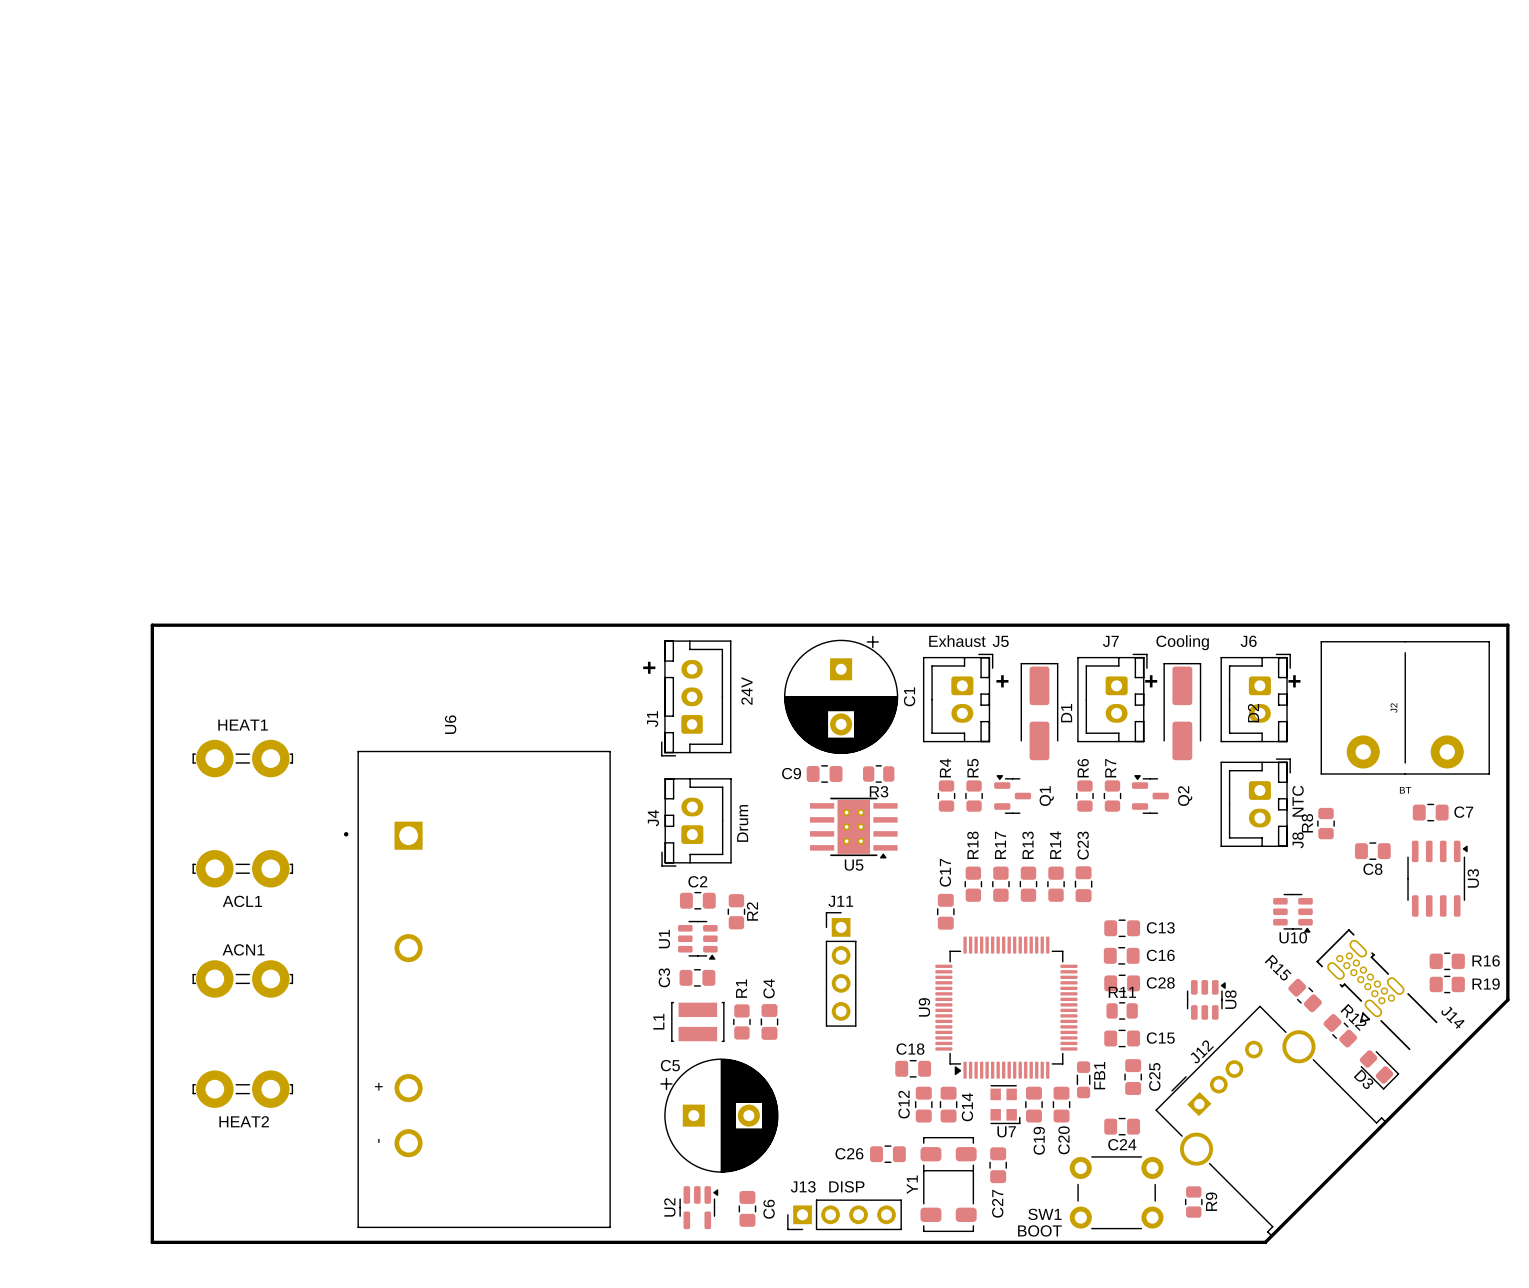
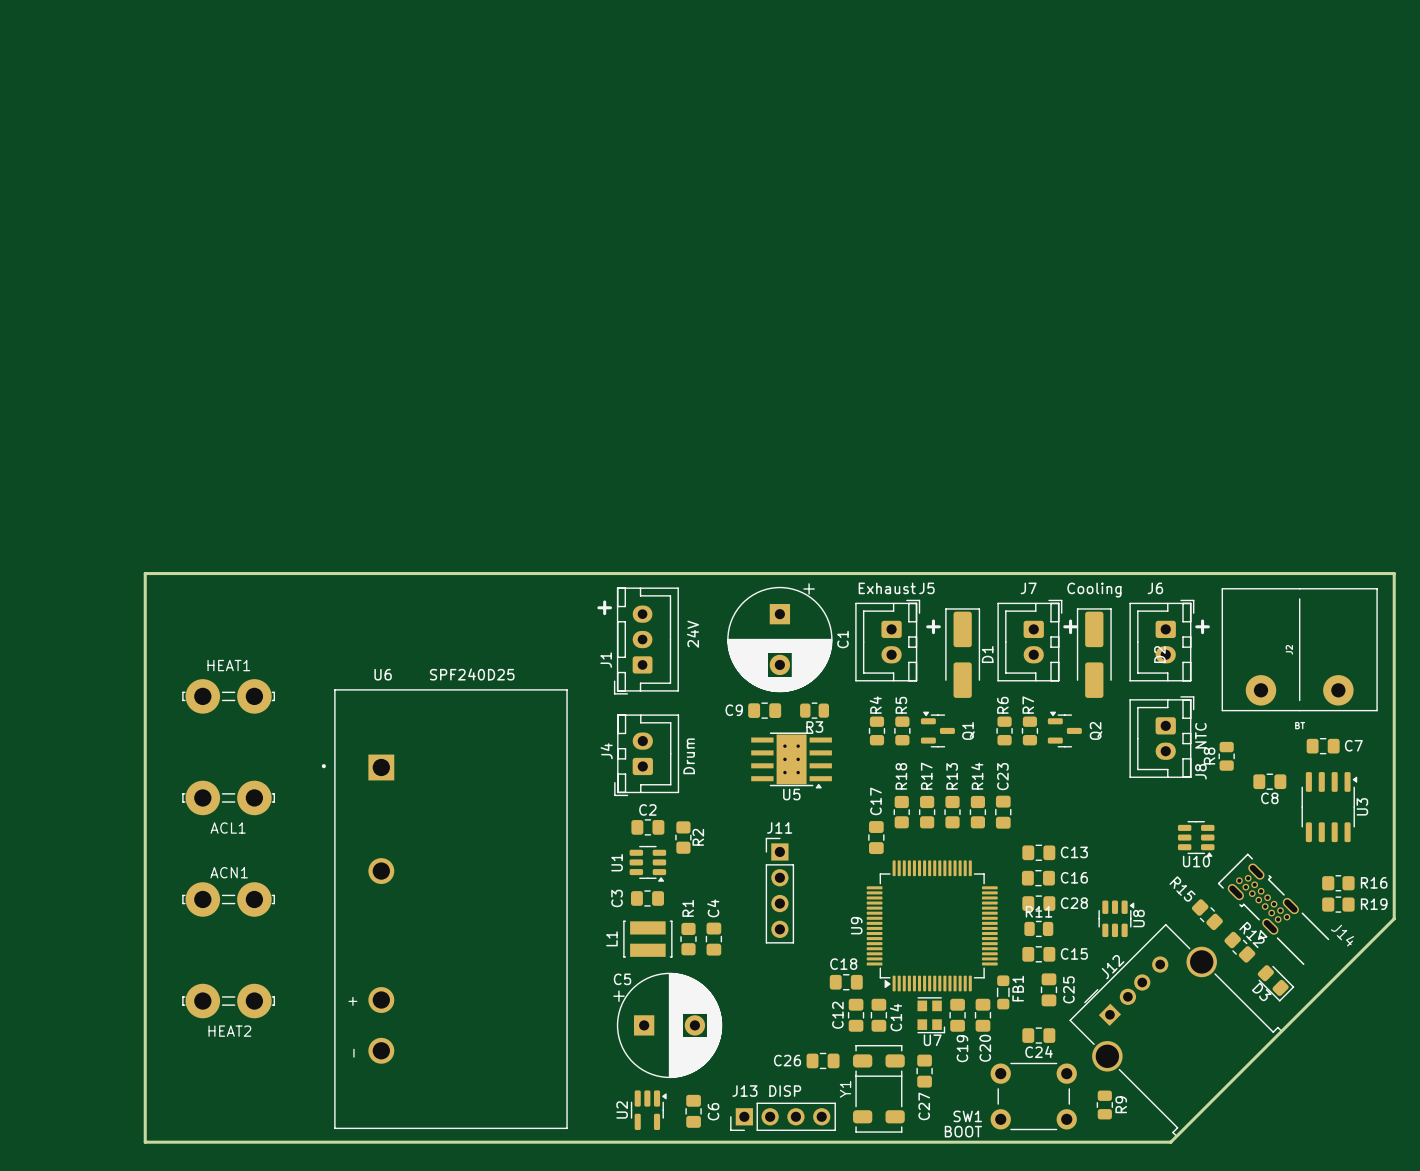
U6 name rotation: 0° (450, 724) -> 90° clockwise (383, 674)
U6 name position: U6 (450, 724) -> U6 (383, 674)
U6 value: none -> SPF240D25 (472, 674)

